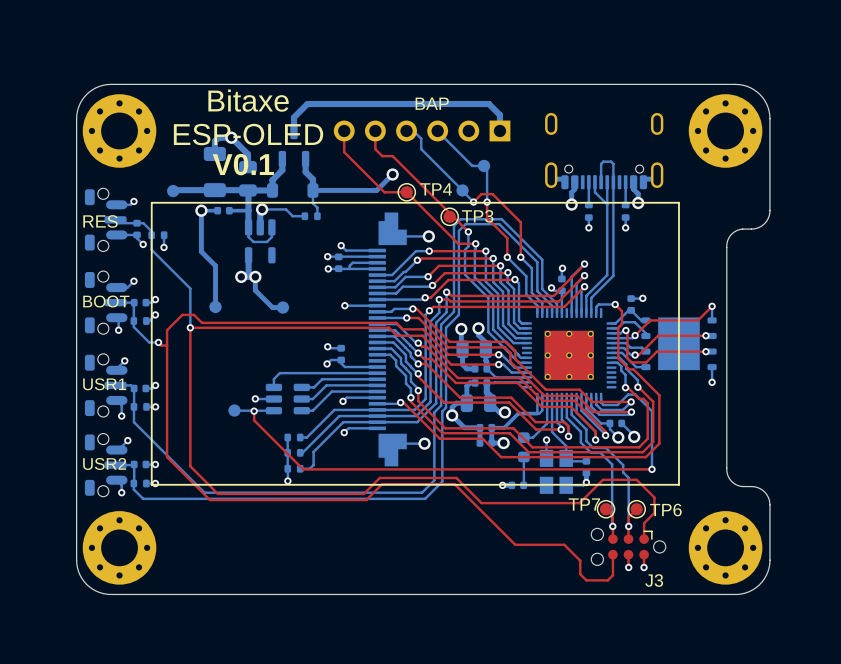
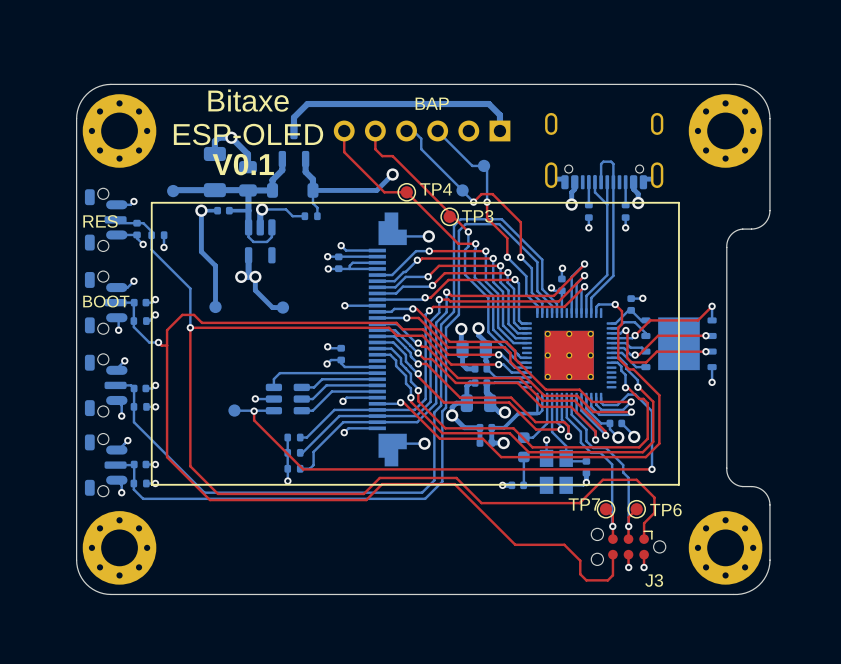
text: USR1 (104, 384) -> none
text: USR2 (104, 463) -> none

